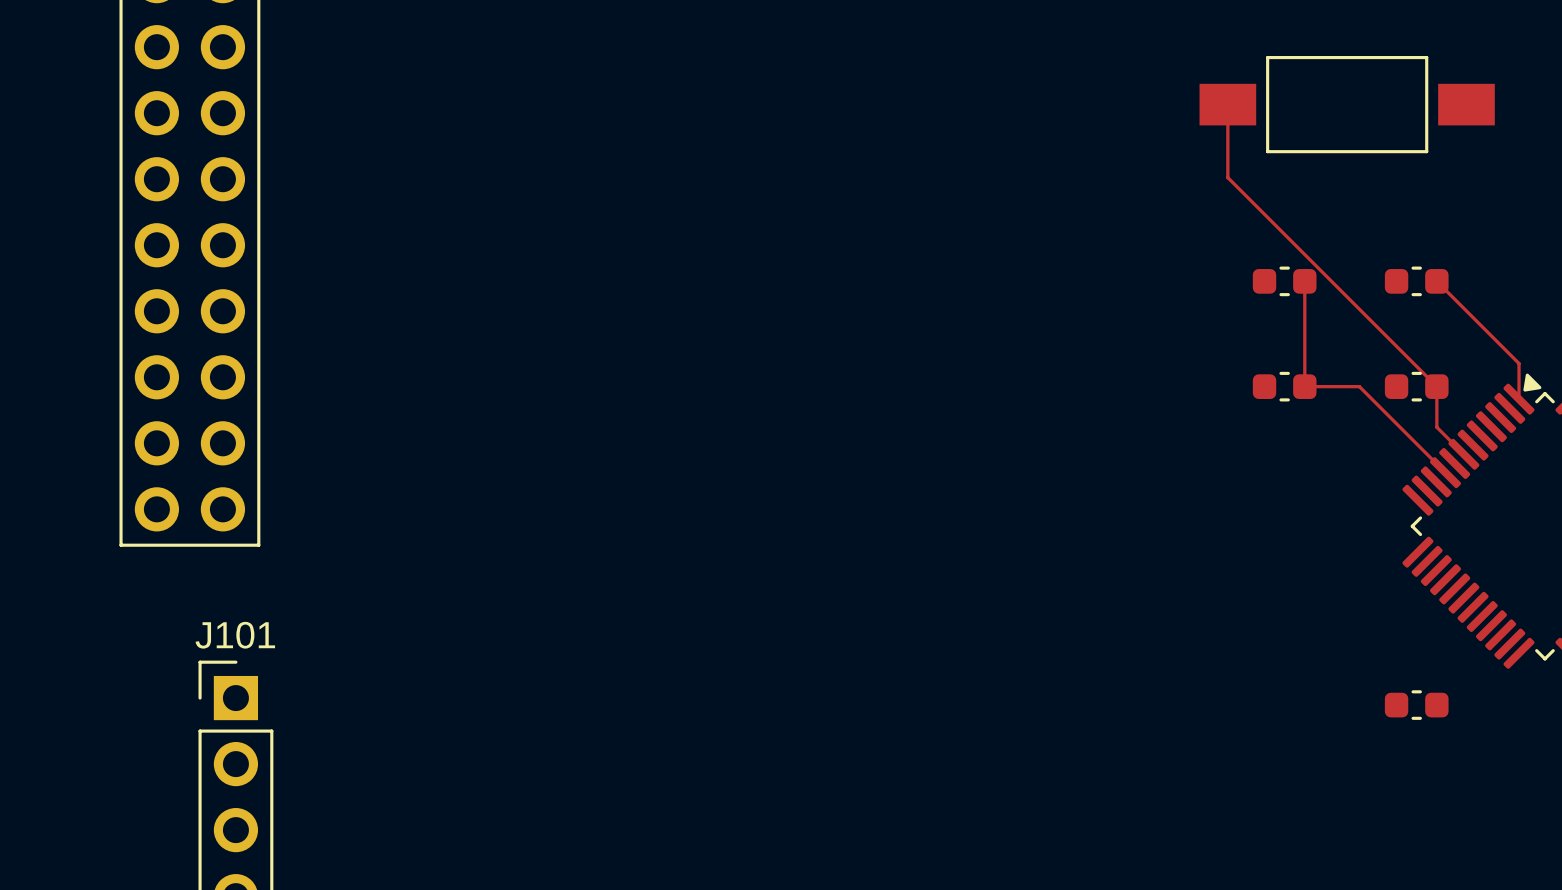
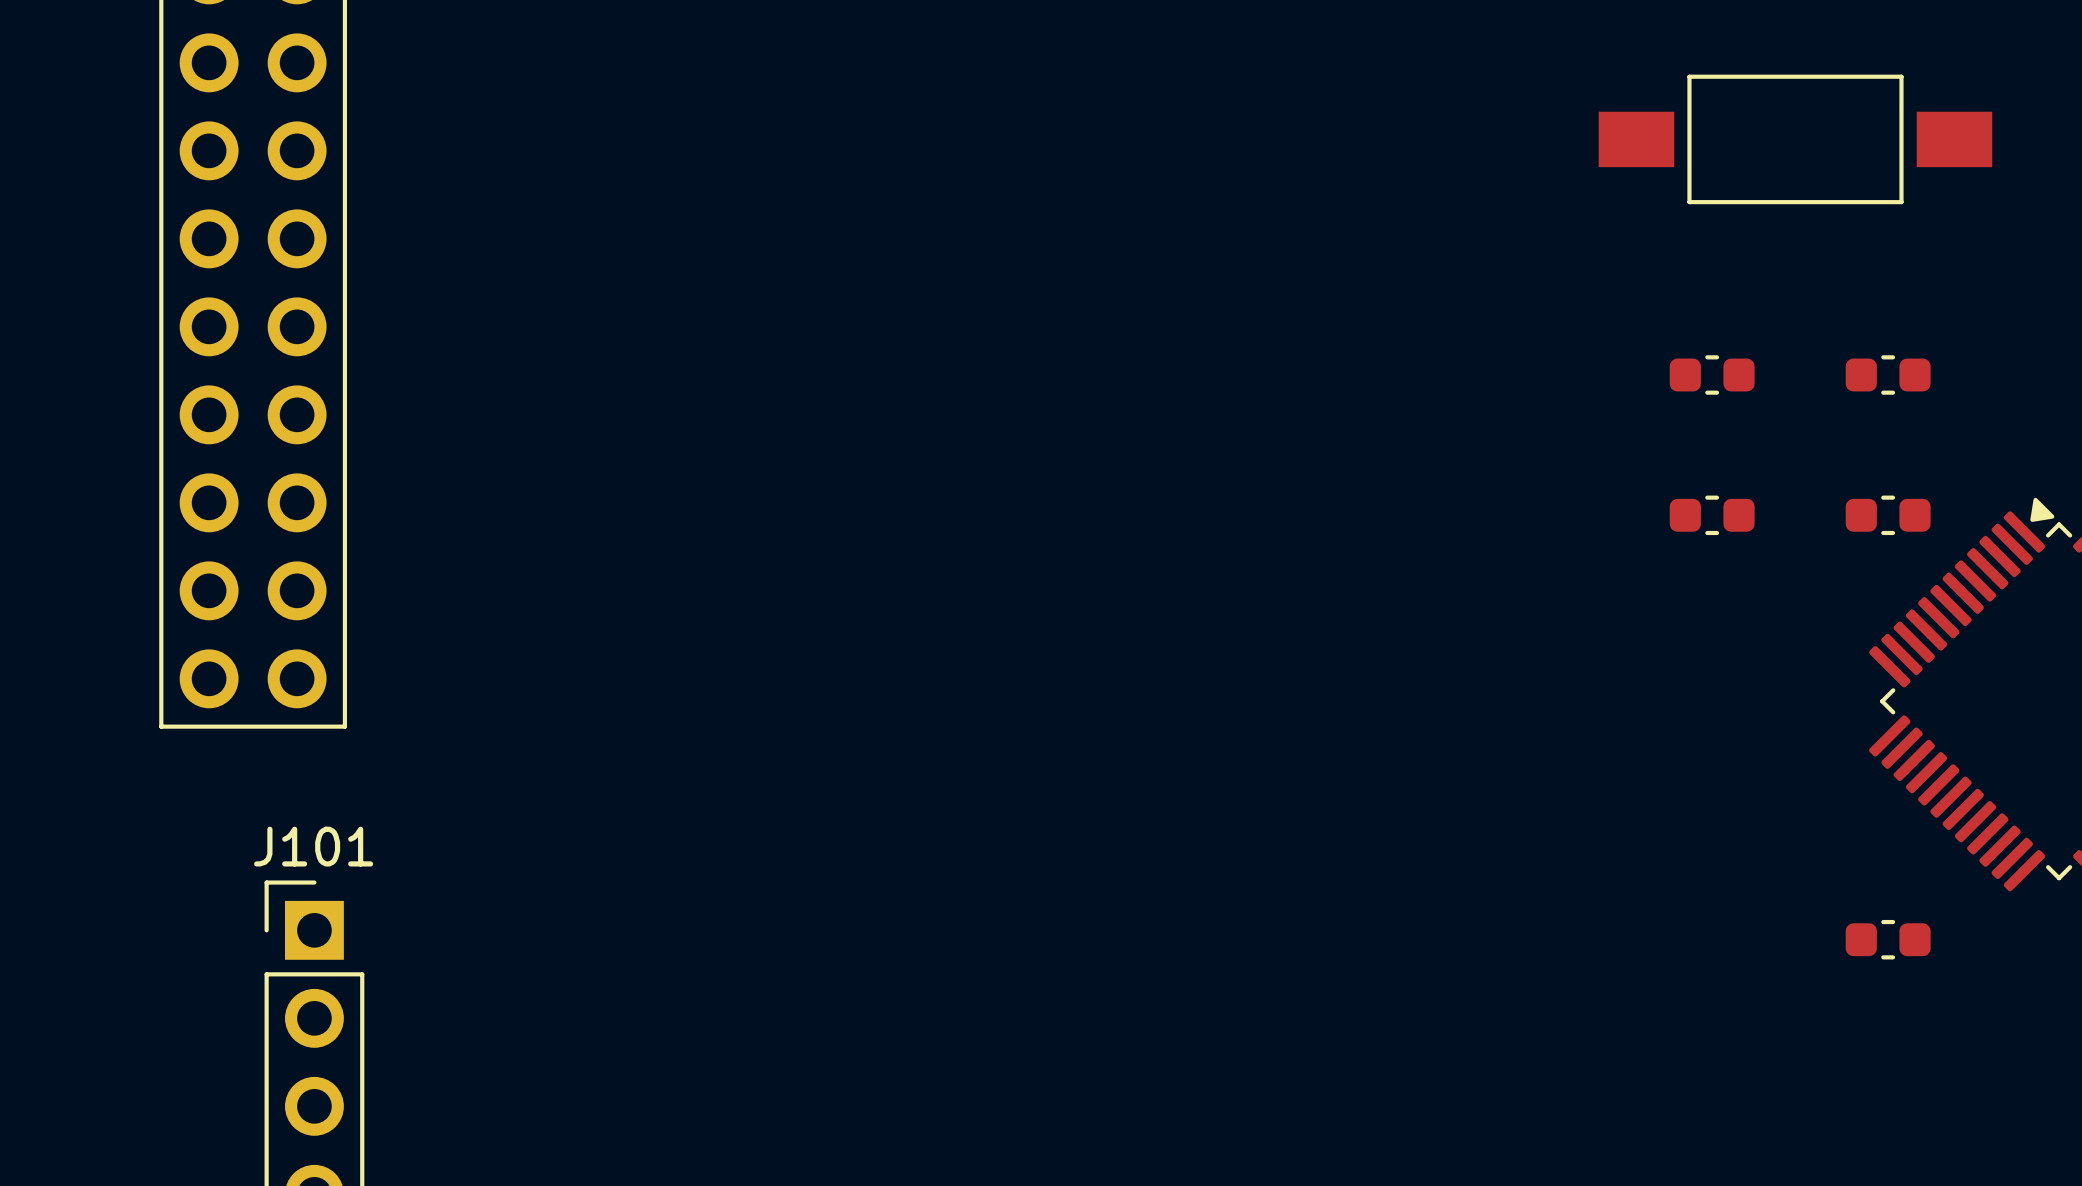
track: (1227, 104) (1227, 177) (1436, 386) (1436, 427) (1463, 454) -> none
track: (1304, 281) (1304, 386) (1359, 386) (1445, 472) -> none
track: (1436, 281) (1519, 363) (1519, 399) -> none

